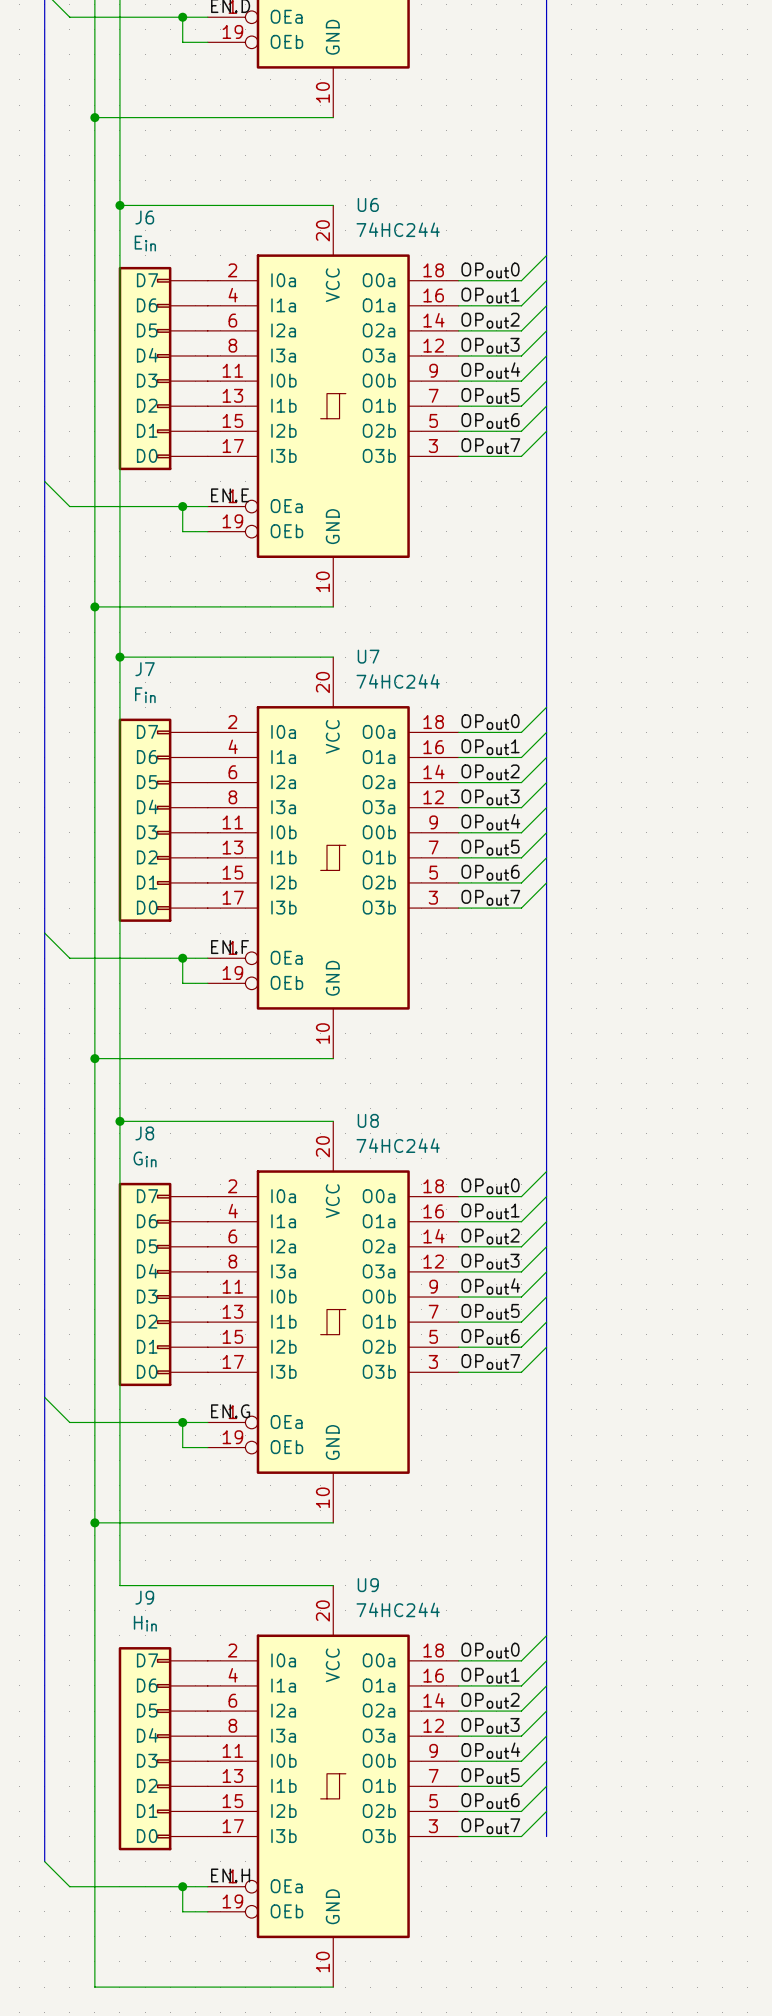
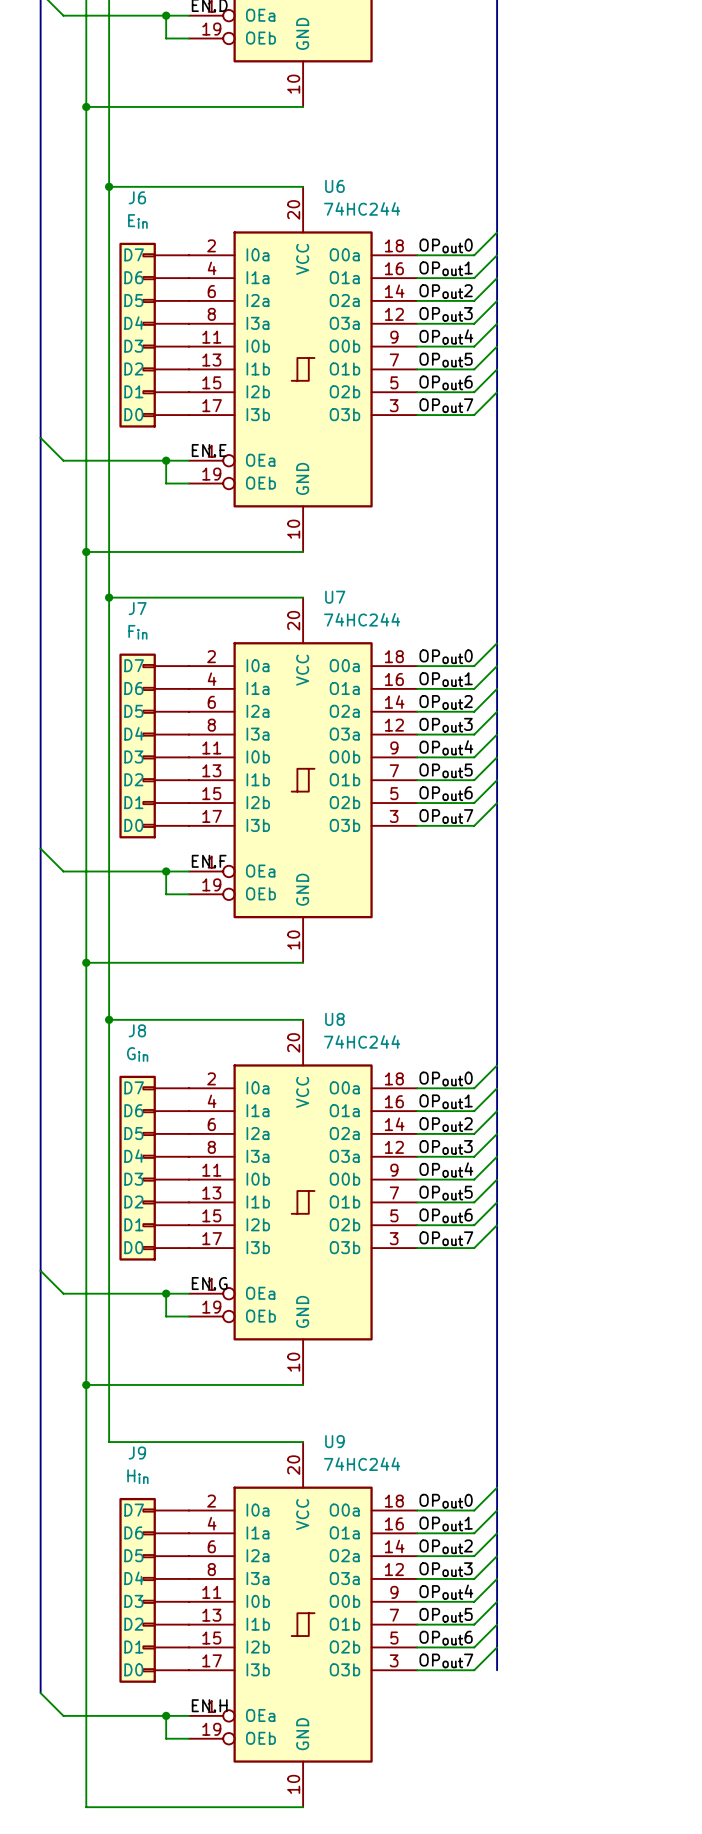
J6 symbol: [118, 266, 208, 471] -> [119, 242, 189, 428]
J7 symbol: [118, 718, 208, 922] -> [119, 653, 189, 839]
J8 symbol: [118, 1182, 208, 1387] -> [119, 1075, 189, 1261]
J9 symbol: [118, 1647, 208, 1851] -> [119, 1497, 189, 1683]

